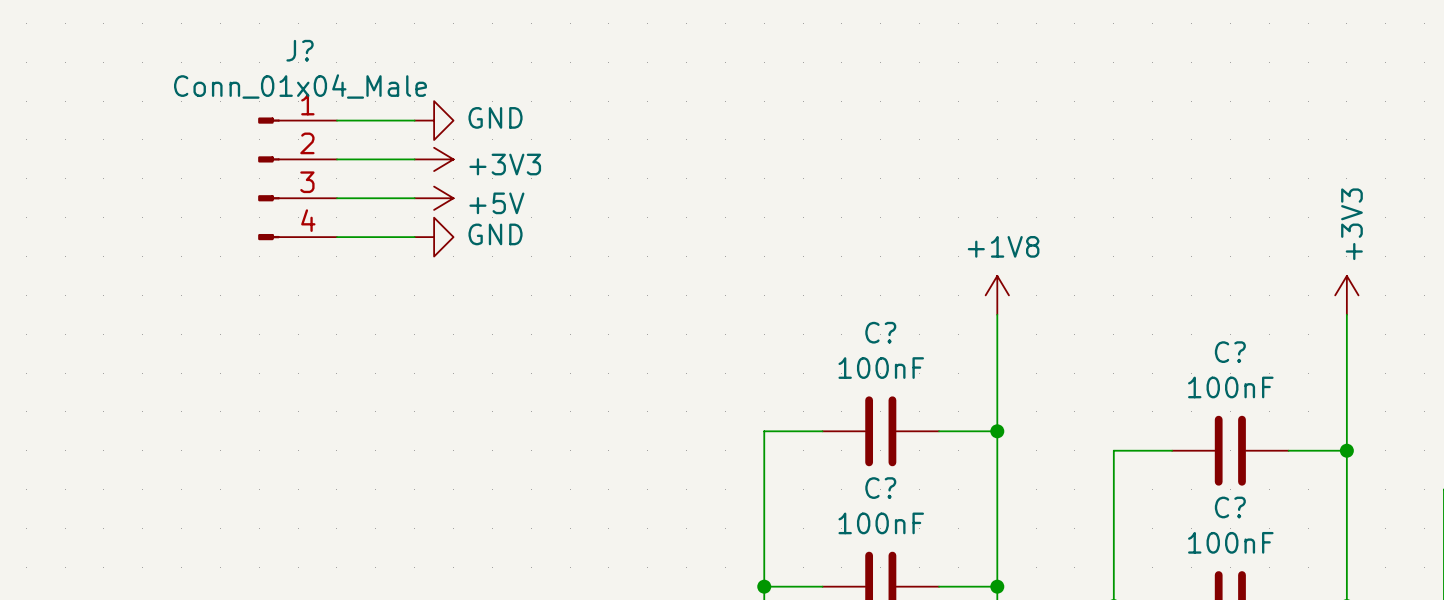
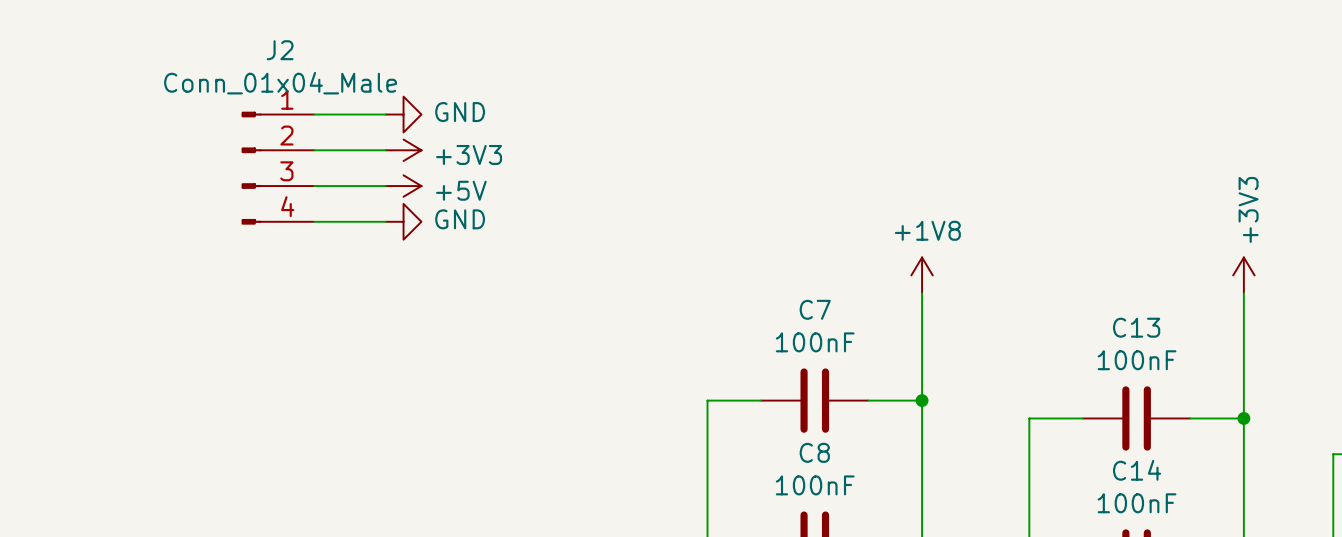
J? name: J? (300, 50) -> J2 (280, 50)
C? name: C? (880, 332) -> C7 (815, 309)
C? name: C? (1230, 352) -> C13 (1136, 327)
C? name: C? (880, 488) -> C8 (814, 452)
C? name: C? (1230, 507) -> C14 (1137, 470)

